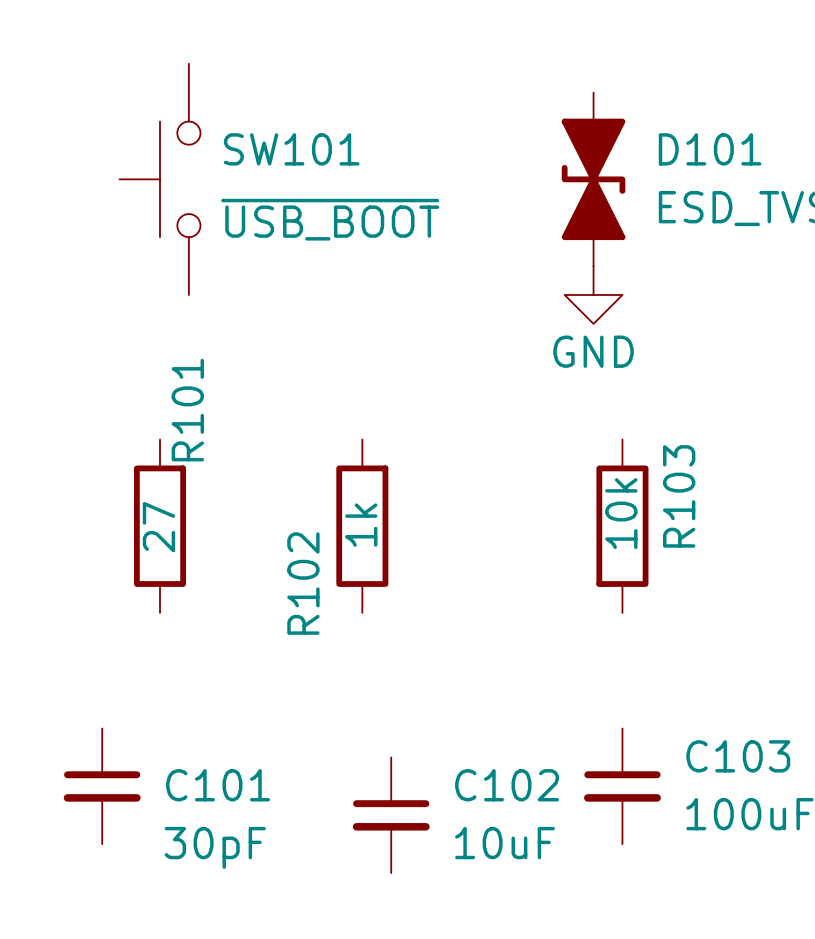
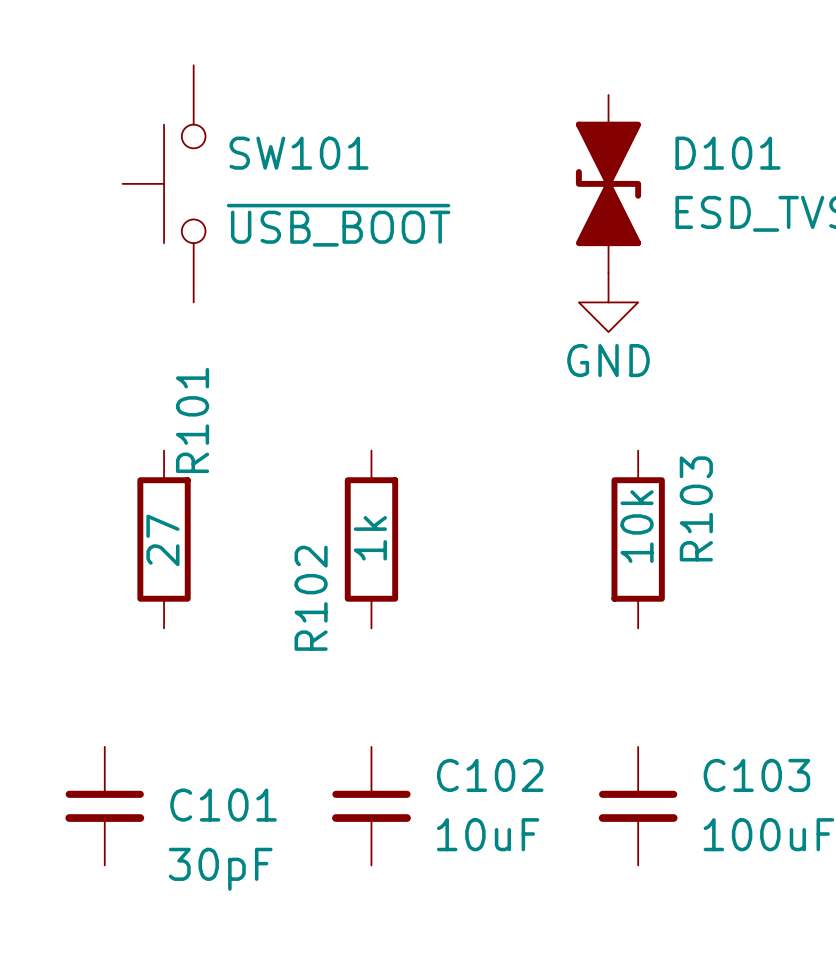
C102 position: (391, 815) -> (371, 806)

